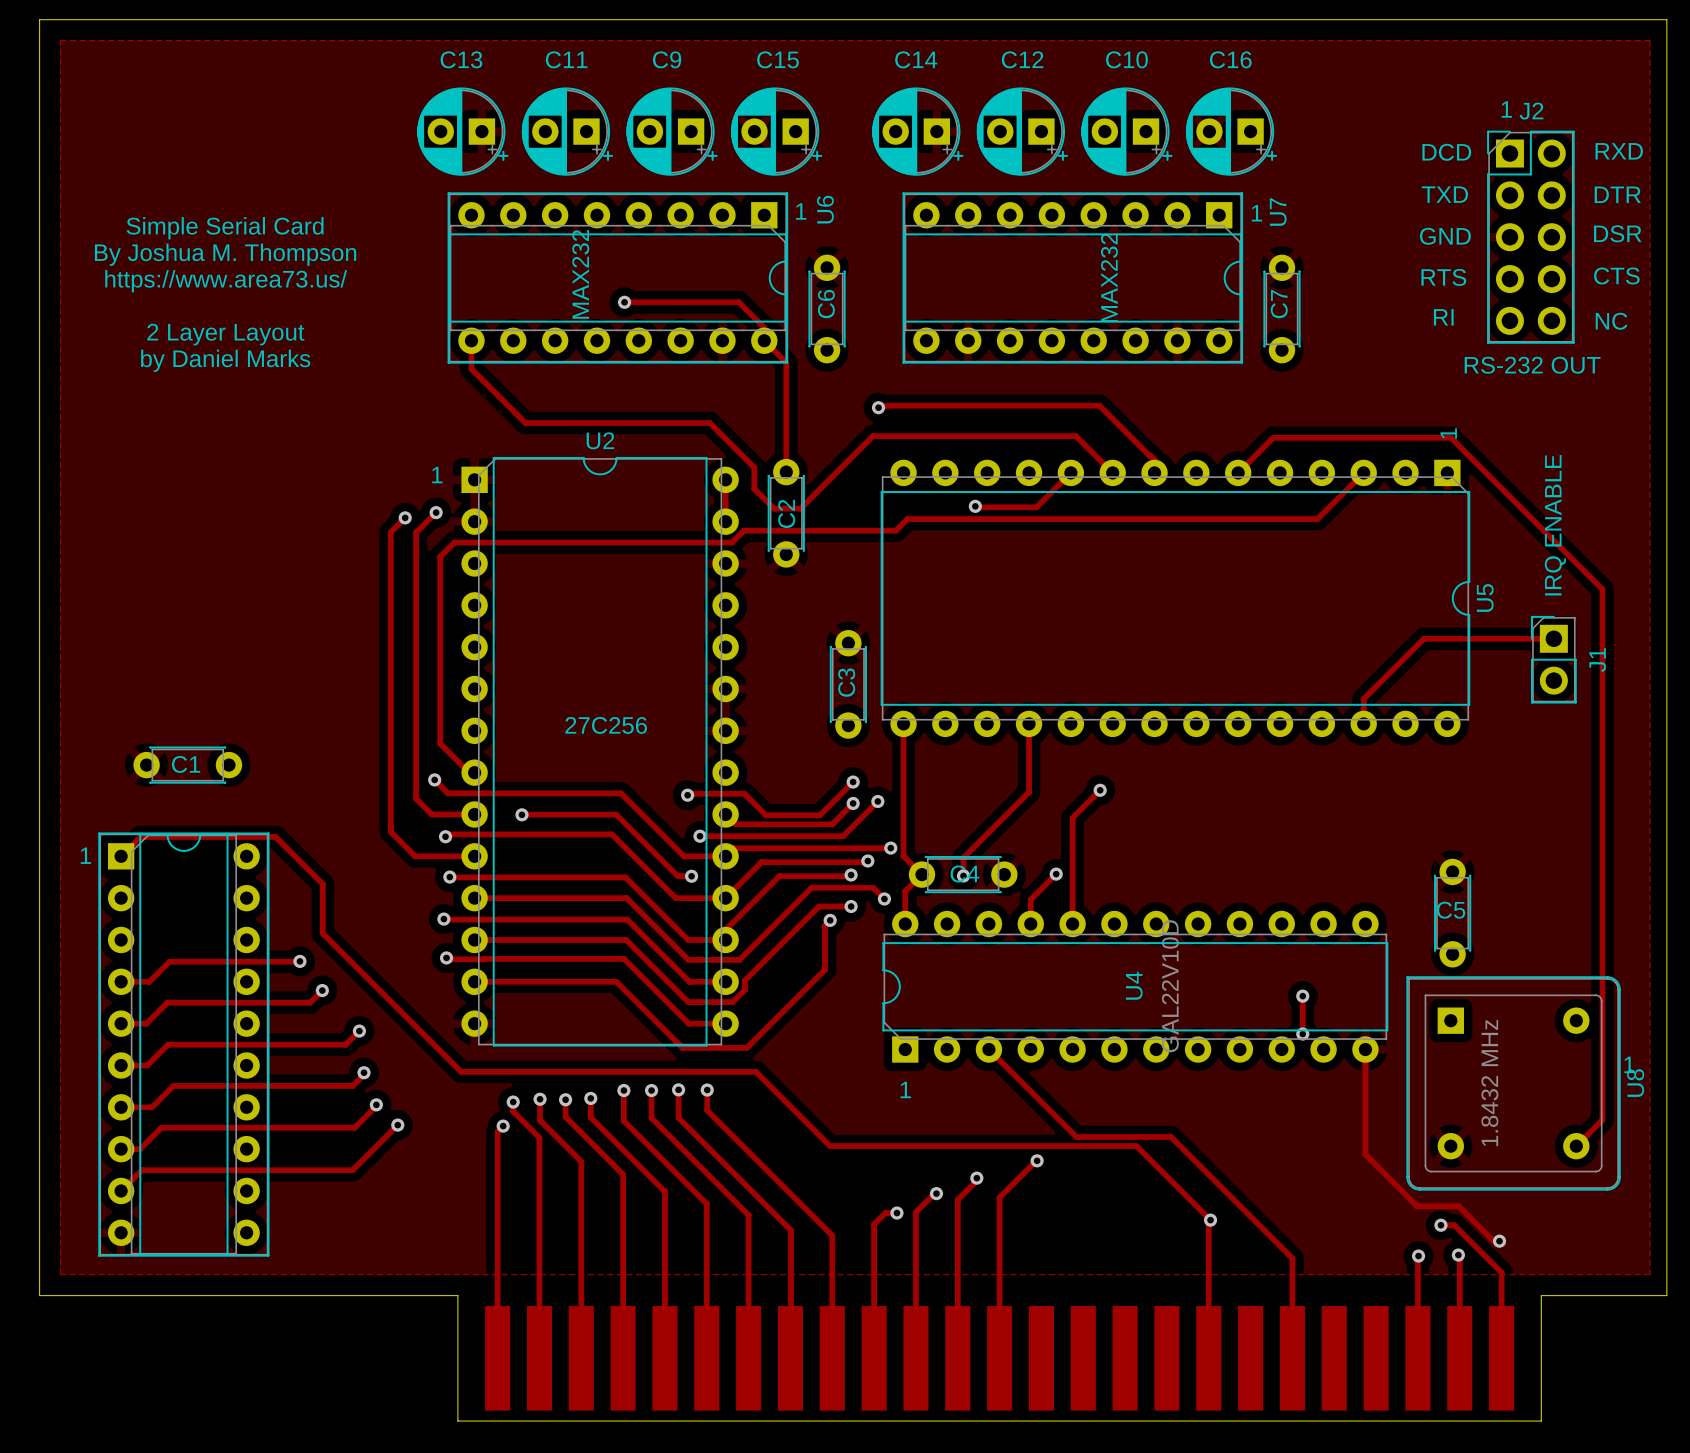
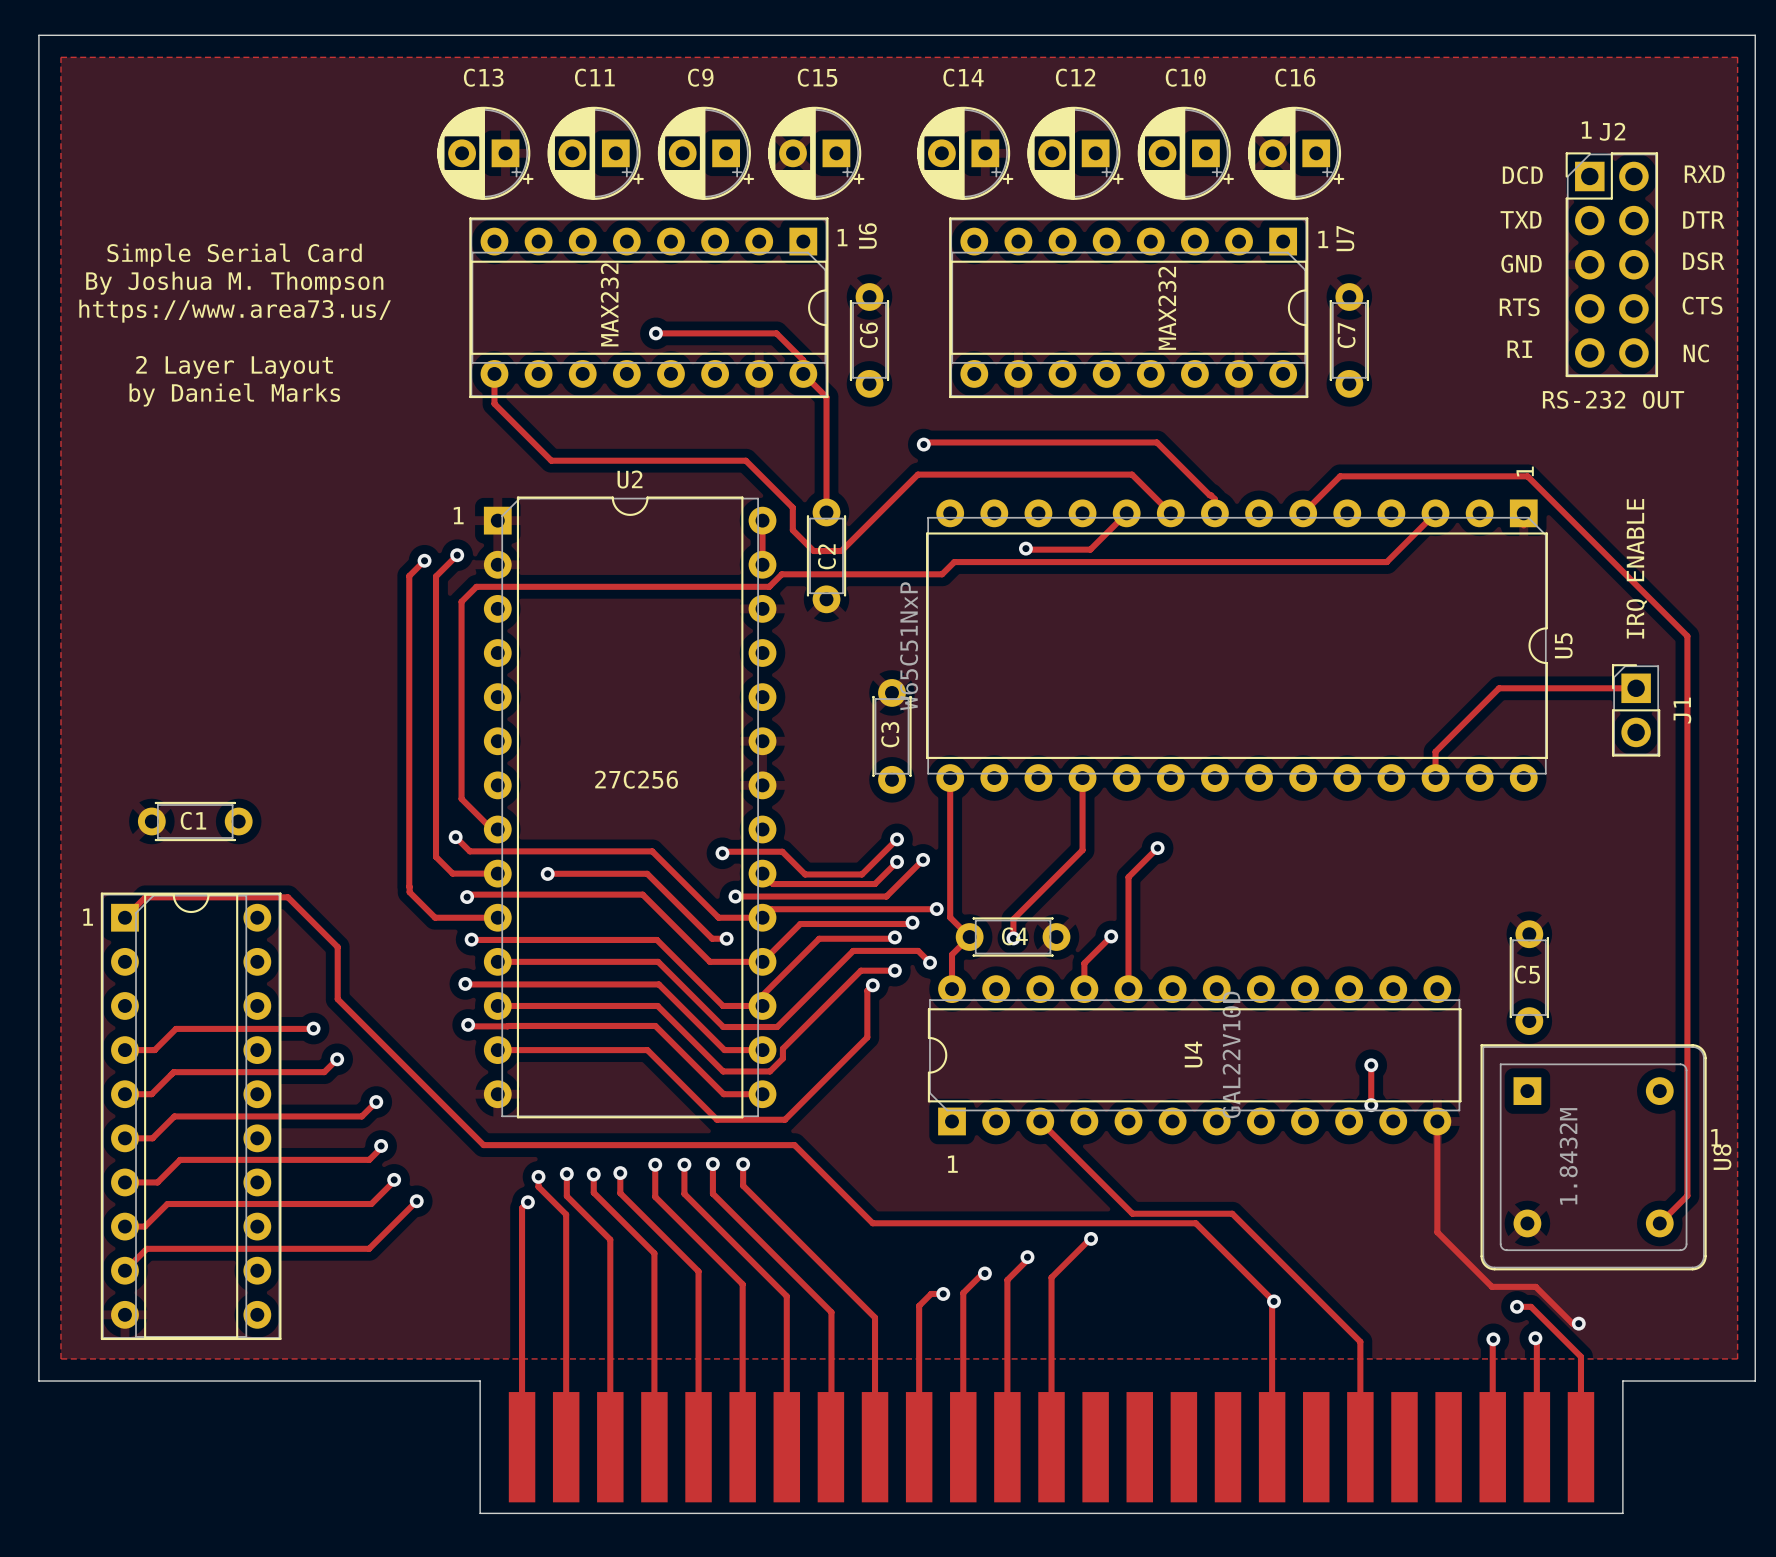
U5 value: none -> W65C51NxP (909, 646)
U8 value: 1.8432 MHz (1489, 1083) -> 1.8432M (1568, 1156)

